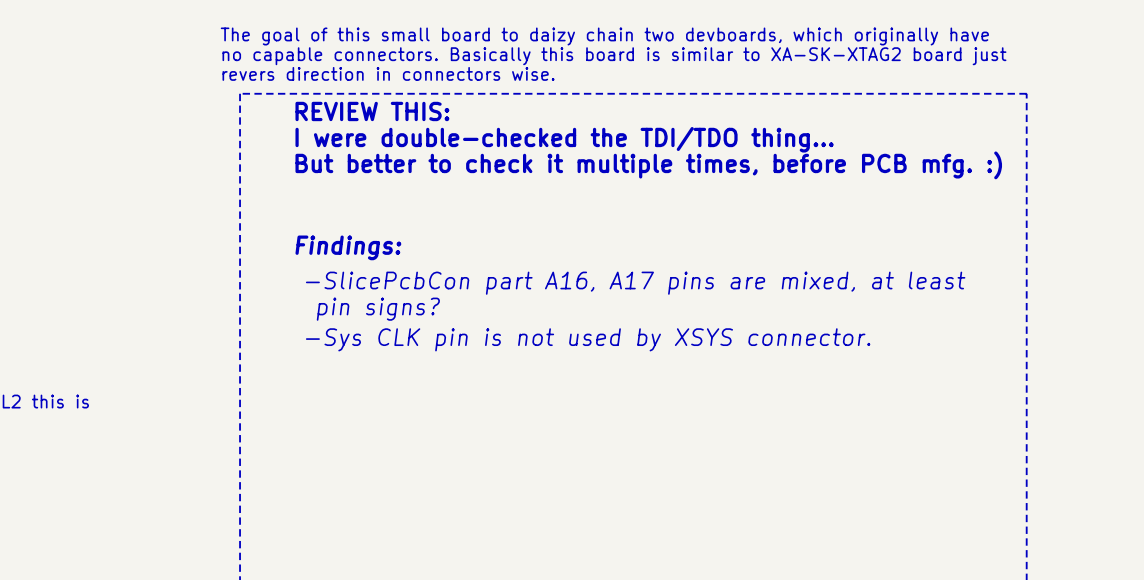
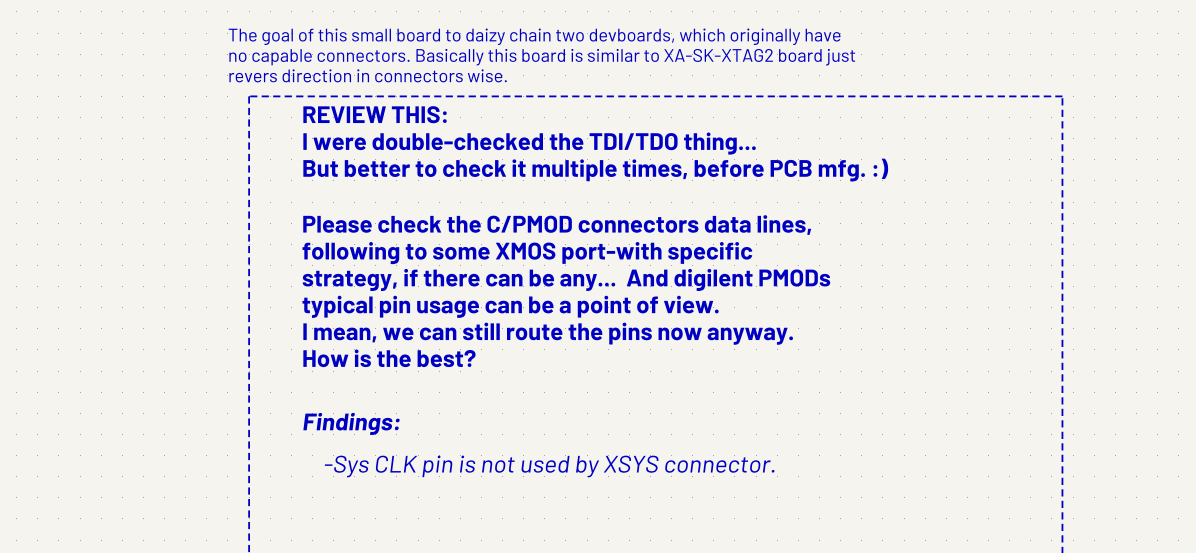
text: none -> Please check the C/PMOD connectors data lines, (557, 225)
text: none -> following to some XMOS port-with specific (527, 253)
text position: Findings: (348, 247) -> Findings: (351, 423)
text: none -> strategy, if there can be any... And digilent PMODs (566, 279)
text: -SlicePcbCon part A16, A17 pins are mixed, at least (635, 283) -> none
text: none -> typical pin usage can be a point of view. (510, 306)
text: pin signs? (378, 309) -> none
text: none -> I mean, we can still route the pins now anyway. (548, 333)
text position: -Sys CLK pin is not used by XSYS connector. (588, 339) -> -Sys CLK pin is not used by XSYS connector. (549, 466)
text: none -> How is the best? (389, 358)

